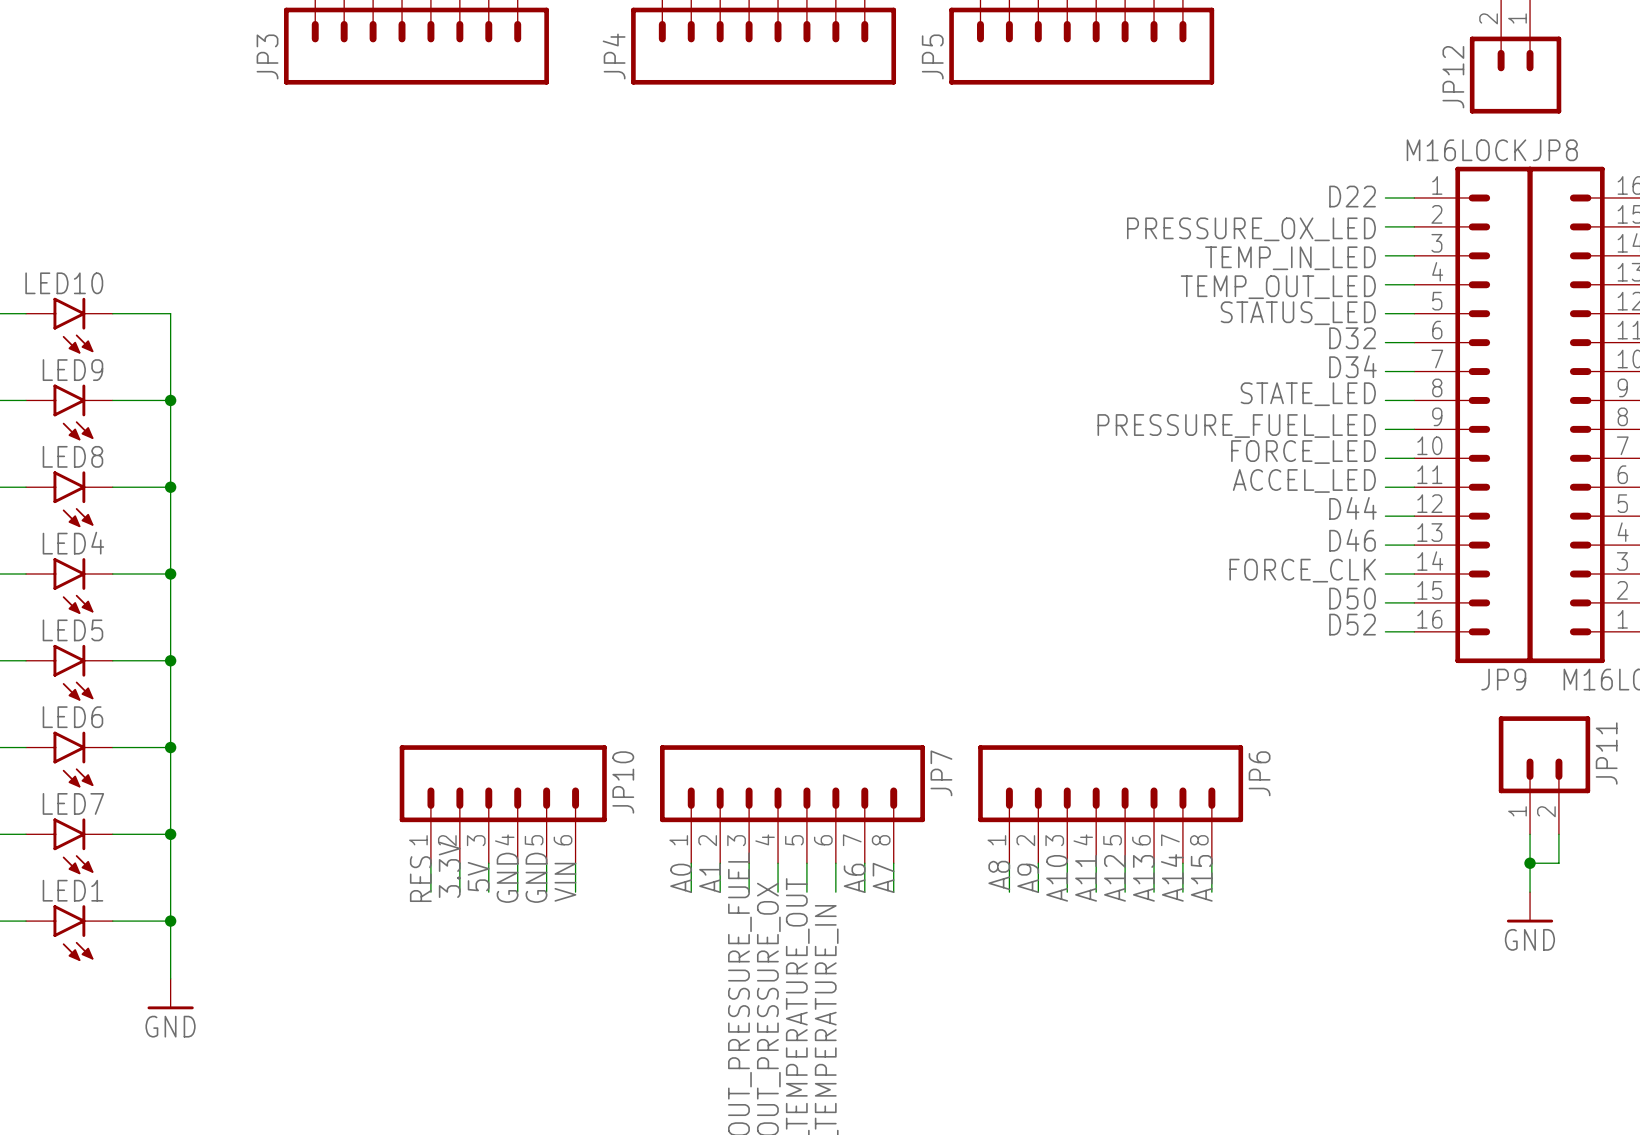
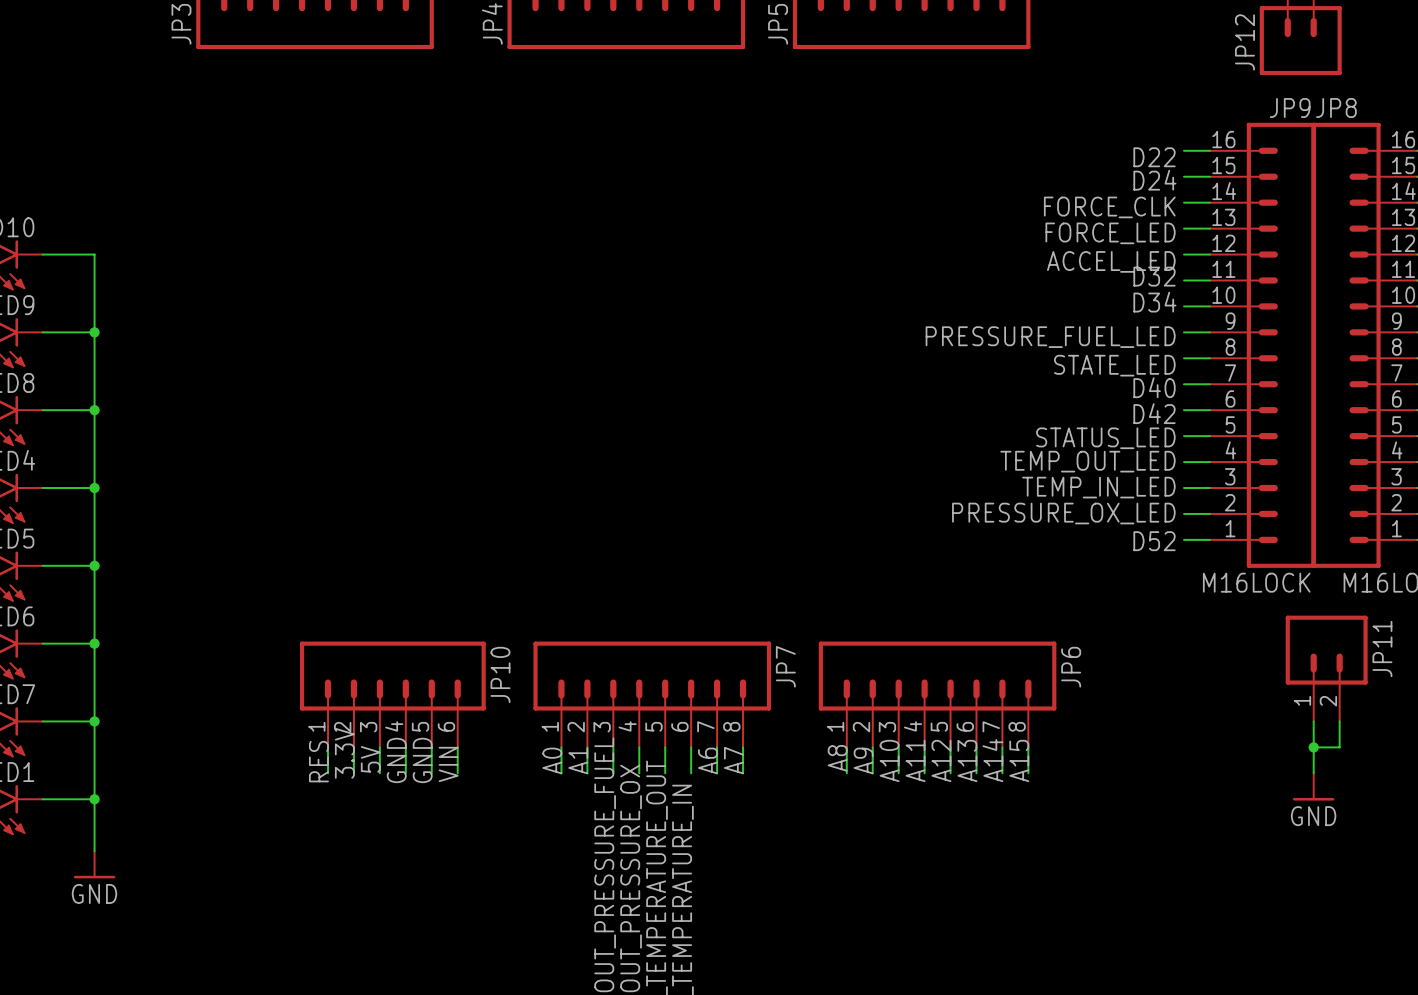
label: D22 (1352, 196) -> none
label: PRESSURE_OX_LED (1251, 229) -> D22 (1154, 157)
label: TEMP_IN_LED (1290, 258) -> D24 (1154, 180)
label: none -> FORCE_CLK (1109, 207)
label position: TEMP_OUT_LED (1278, 287) -> TEMP_OUT_LED (1087, 461)
label: STATUS_LED (1298, 313) -> FORCE_LED (1110, 233)
label position: STATE_LED (1308, 394) -> STATE_LED (1114, 365)
JP9 flip: as is (1493, 414) -> up-down (1281, 345)
label position: PRESSURE_FUEL_LED (1236, 426) -> PRESSURE_FUEL_LED (1050, 337)
label: FORCE_LED (1303, 452) -> none
label: none -> D40 (1154, 387)
label position: ACCEL_LED (1304, 480) -> ACCEL_LED (1111, 261)
label: D44 (1352, 508) -> D42 (1154, 413)
label: D46 (1352, 540) -> STATUS_LED (1105, 438)
label: FORCE_CLK (1302, 570) -> none
label: D50 (1352, 598) -> TEMP_IN_LED (1098, 487)
label: D52 (1352, 624) -> PRESSURE_OX_LED (1063, 513)
label: none -> D52 (1154, 541)

